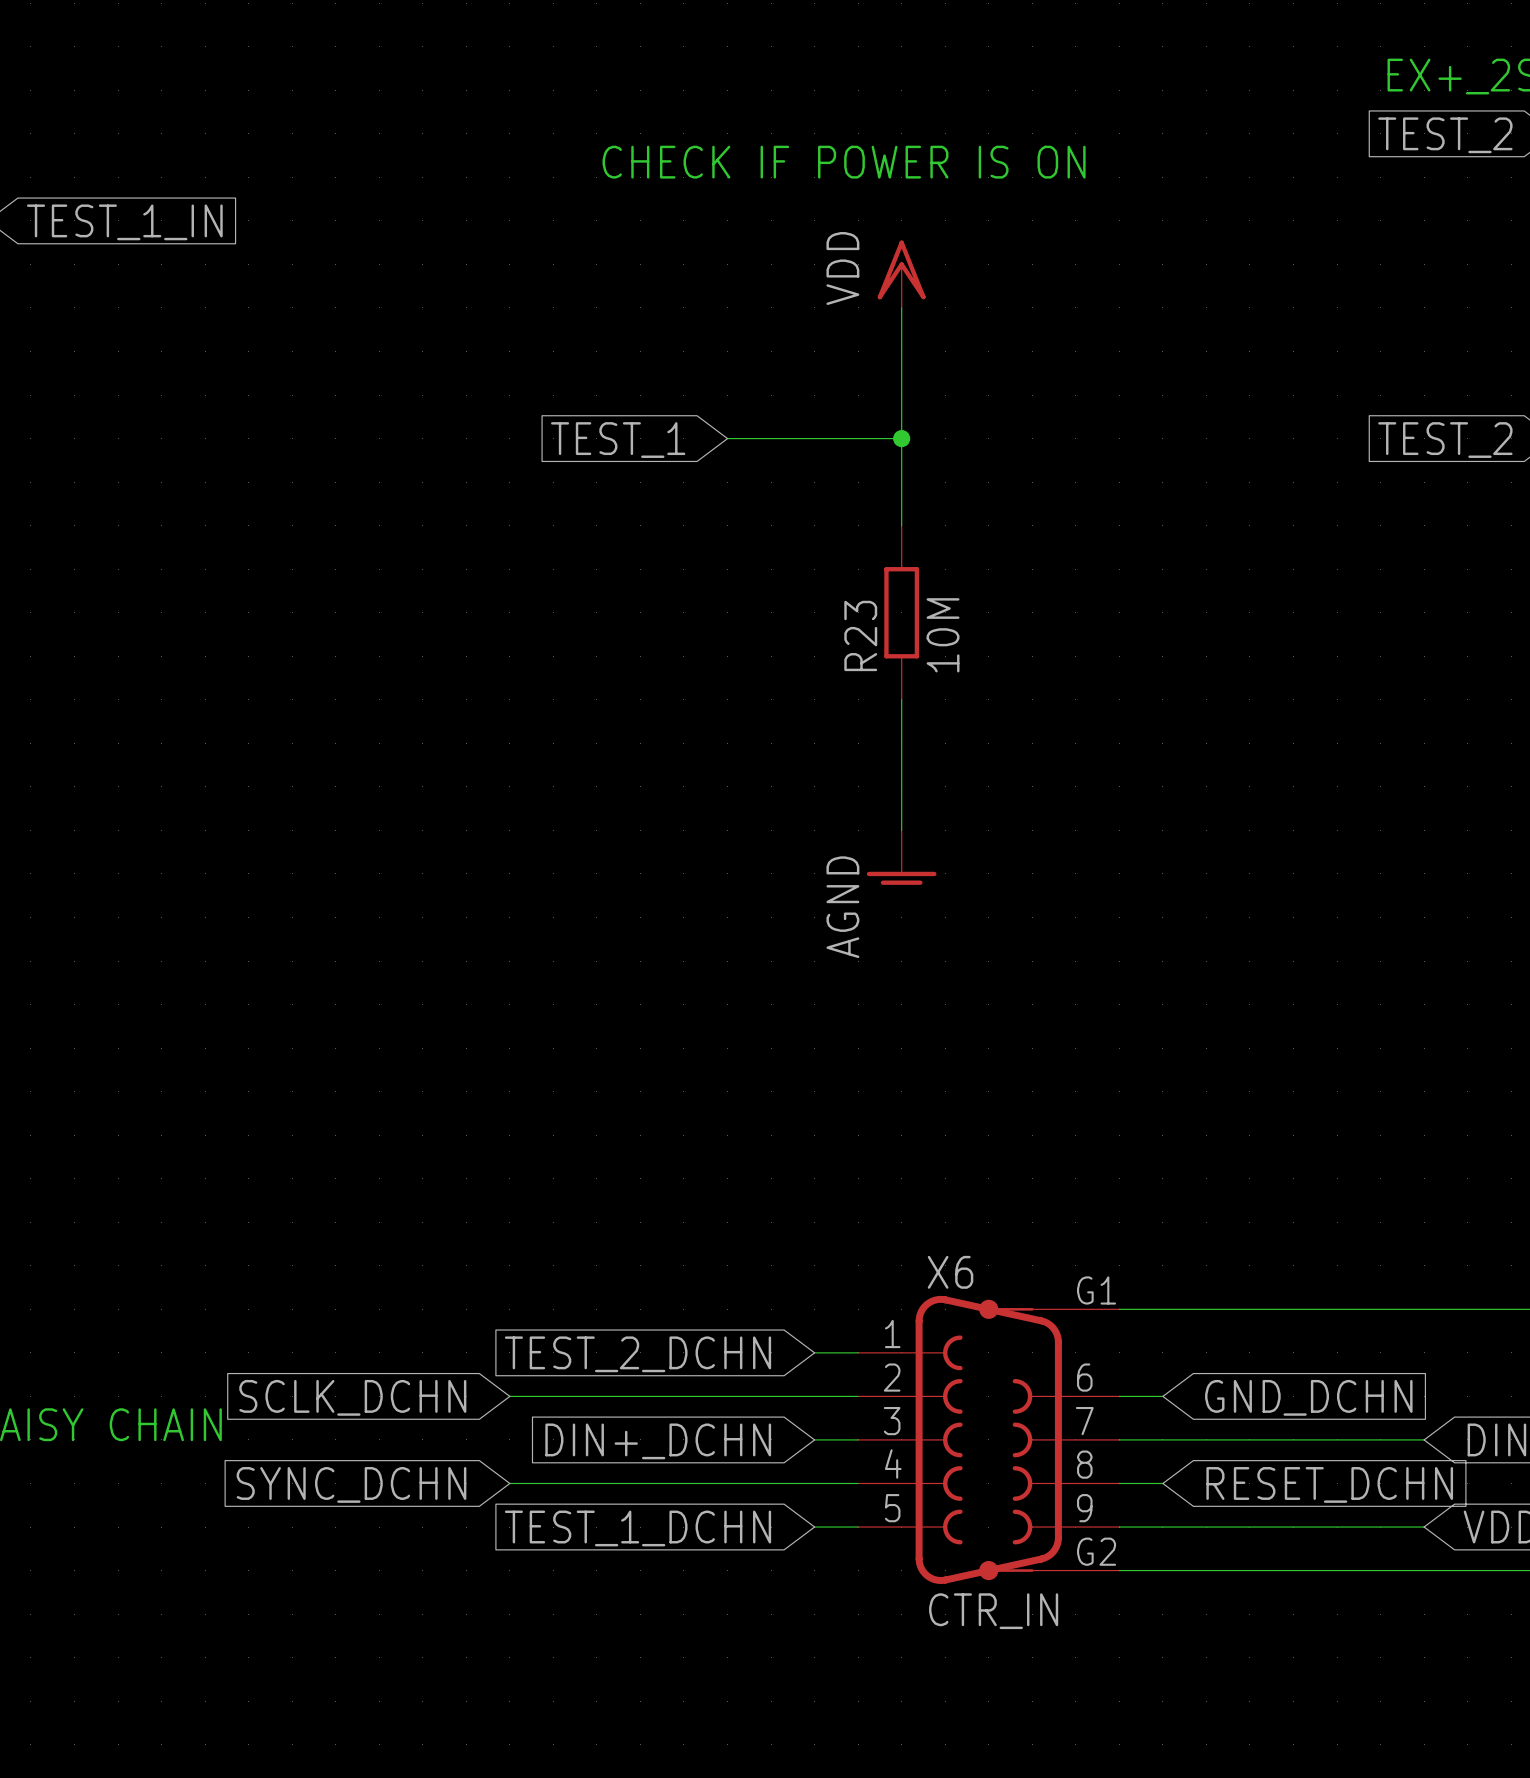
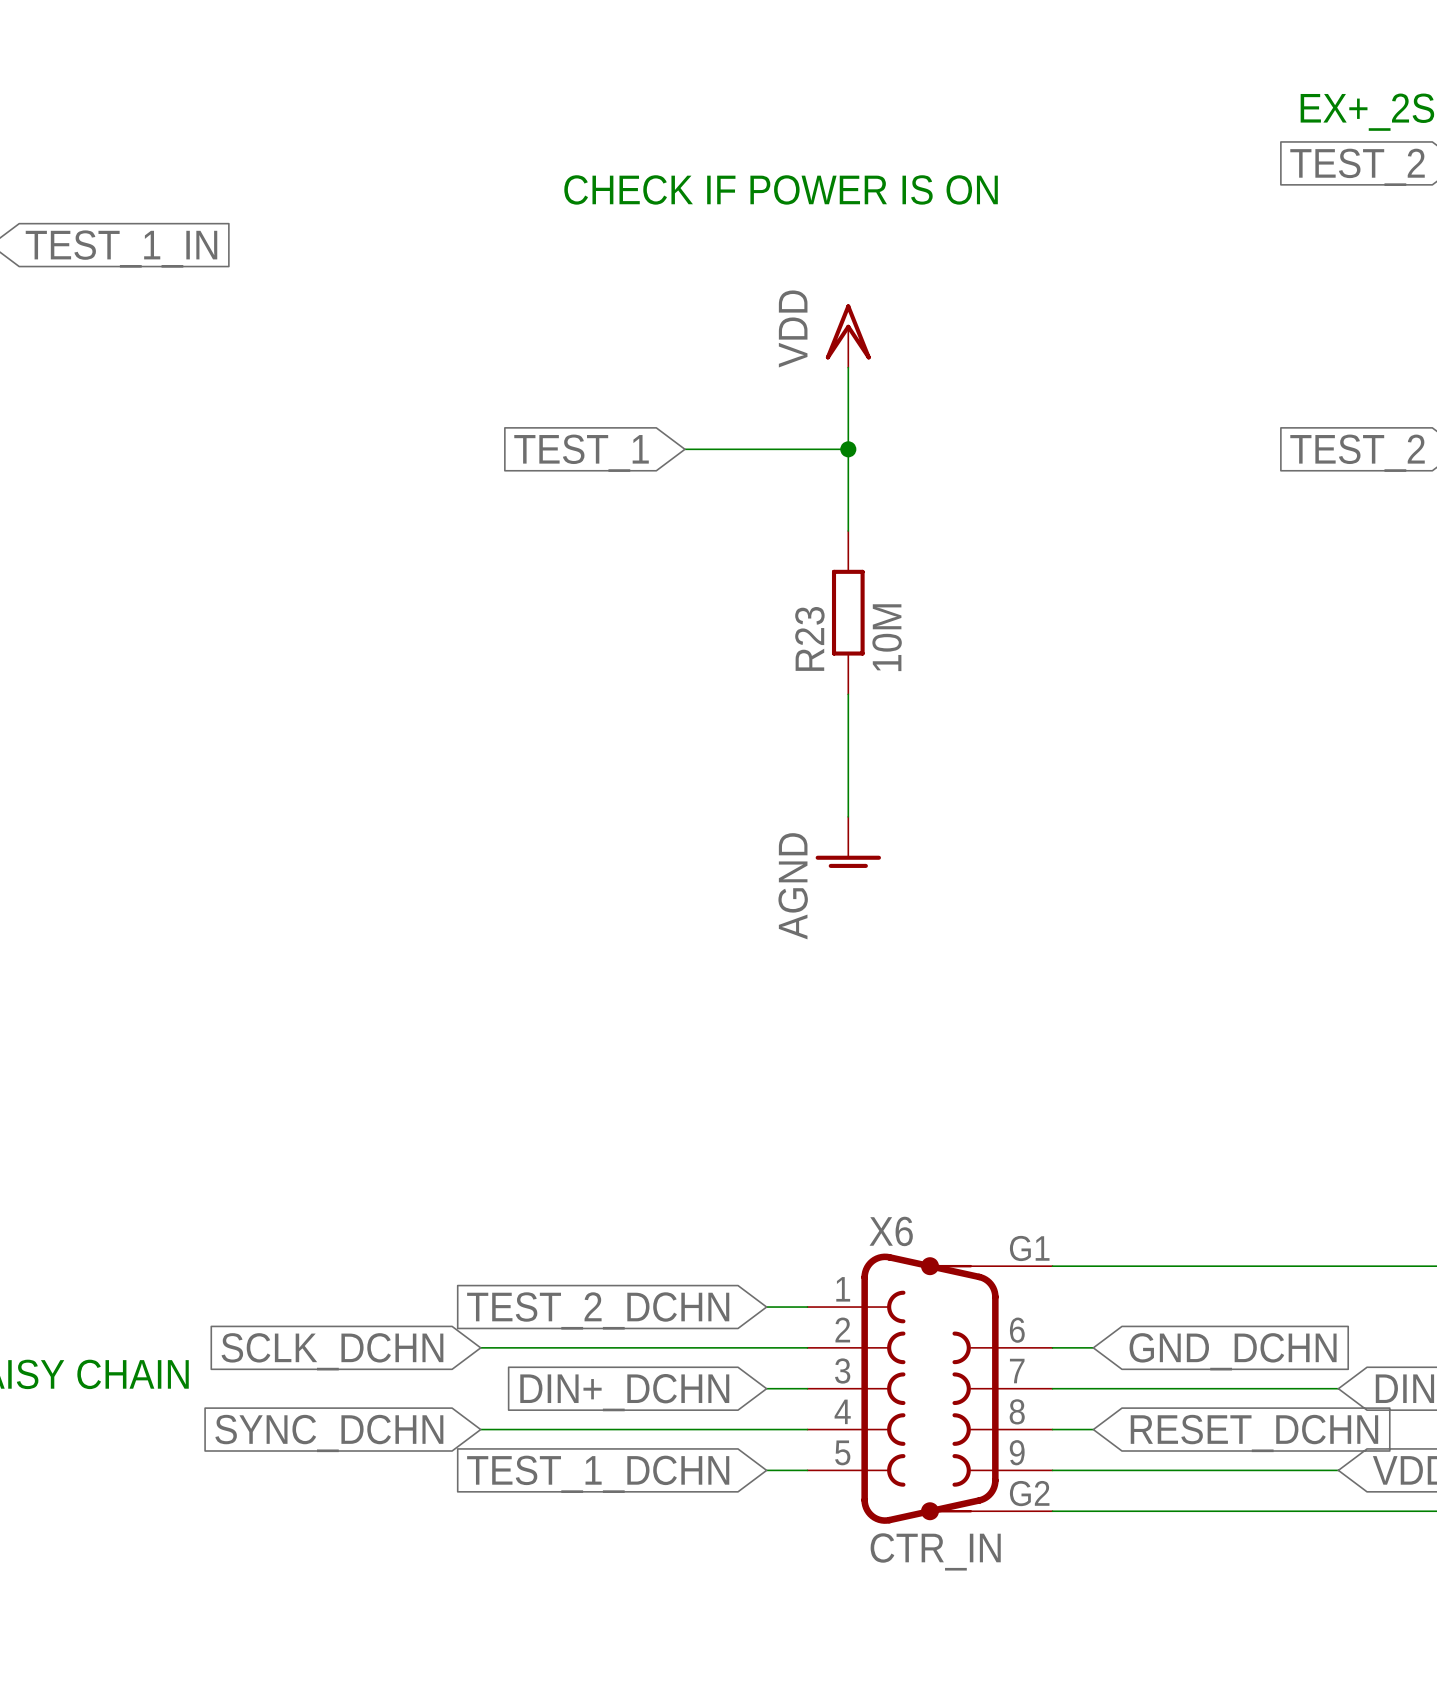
power symbol position: VDD (901, 274) -> VDD (848, 335)

